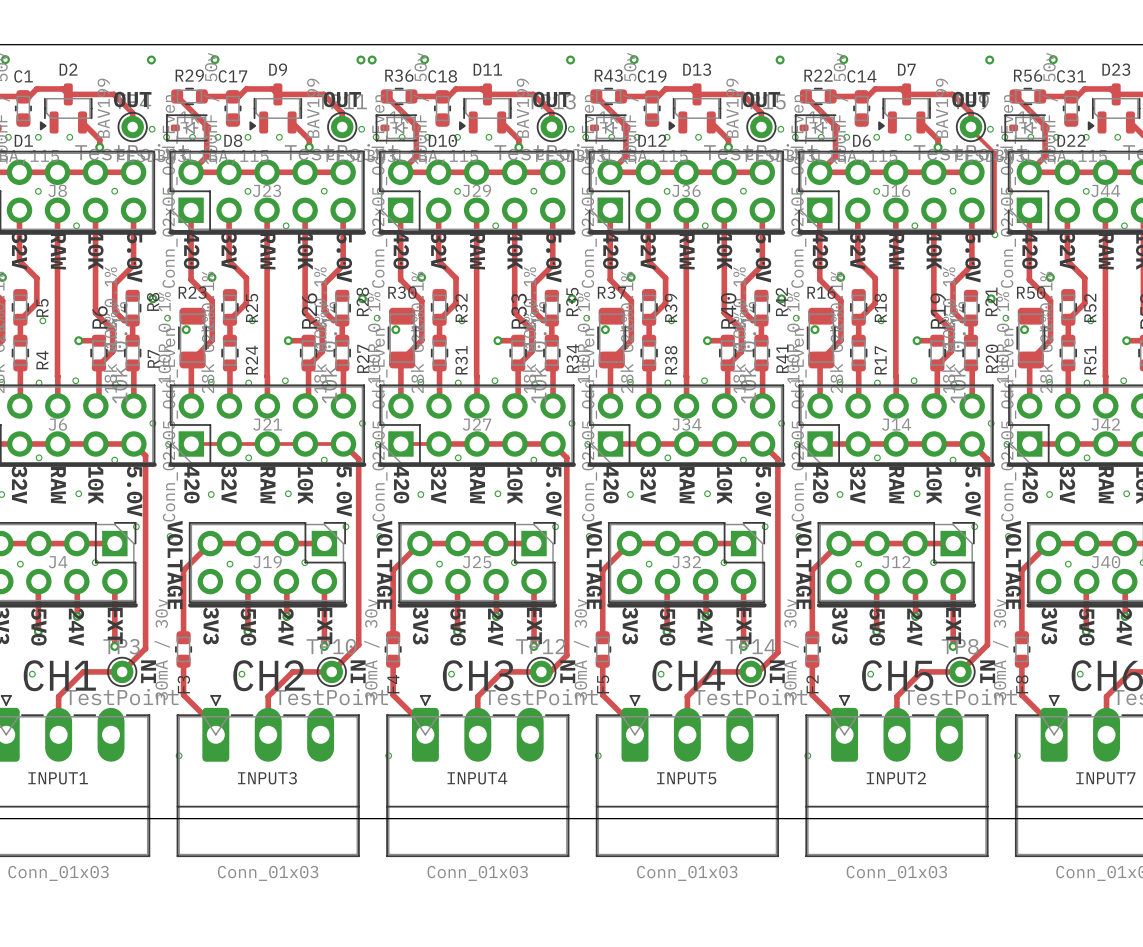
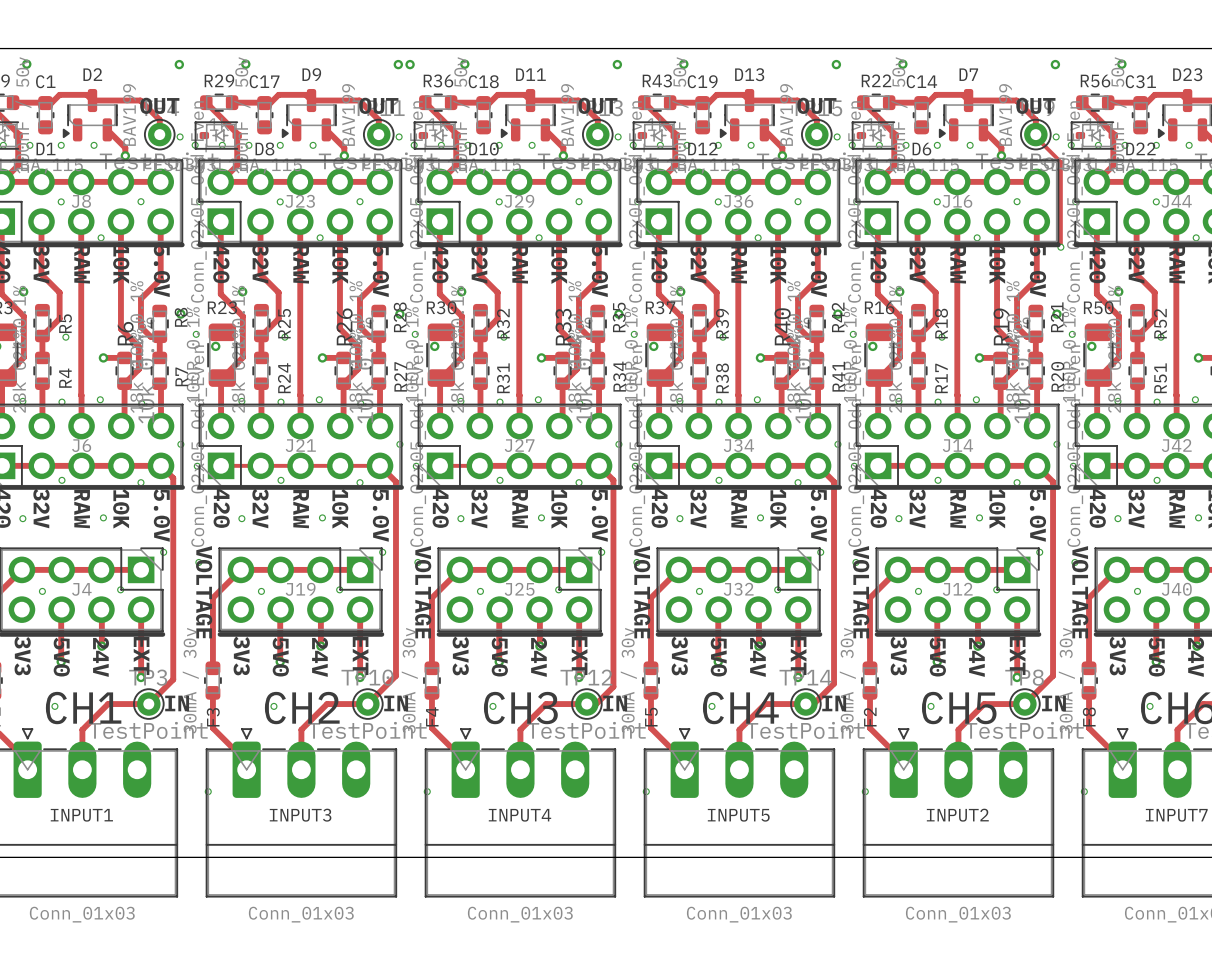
text rotation: 0° (148, 671) -> 90° clockwise (177, 703)
text rotation: 0° (358, 671) -> 90° clockwise (396, 703)
text rotation: 0° (567, 671) -> 90° clockwise (615, 703)
text rotation: 0° (777, 671) -> 90° clockwise (834, 703)
text rotation: 0° (987, 671) -> 90° clockwise (1053, 703)

